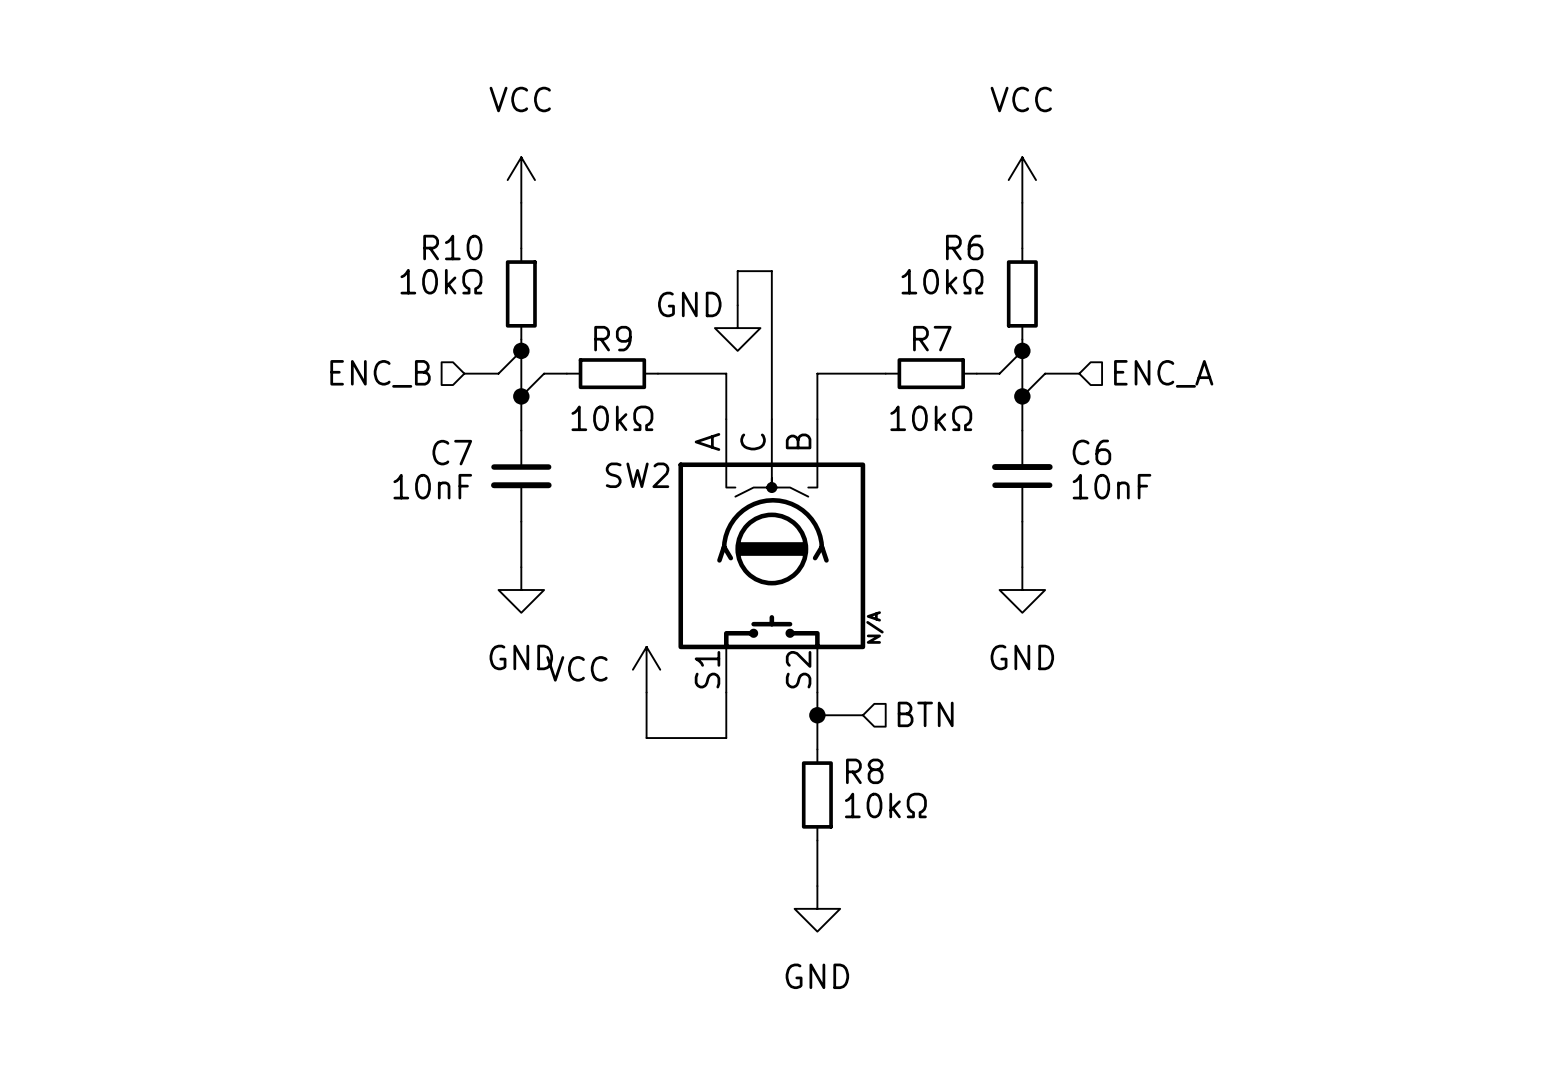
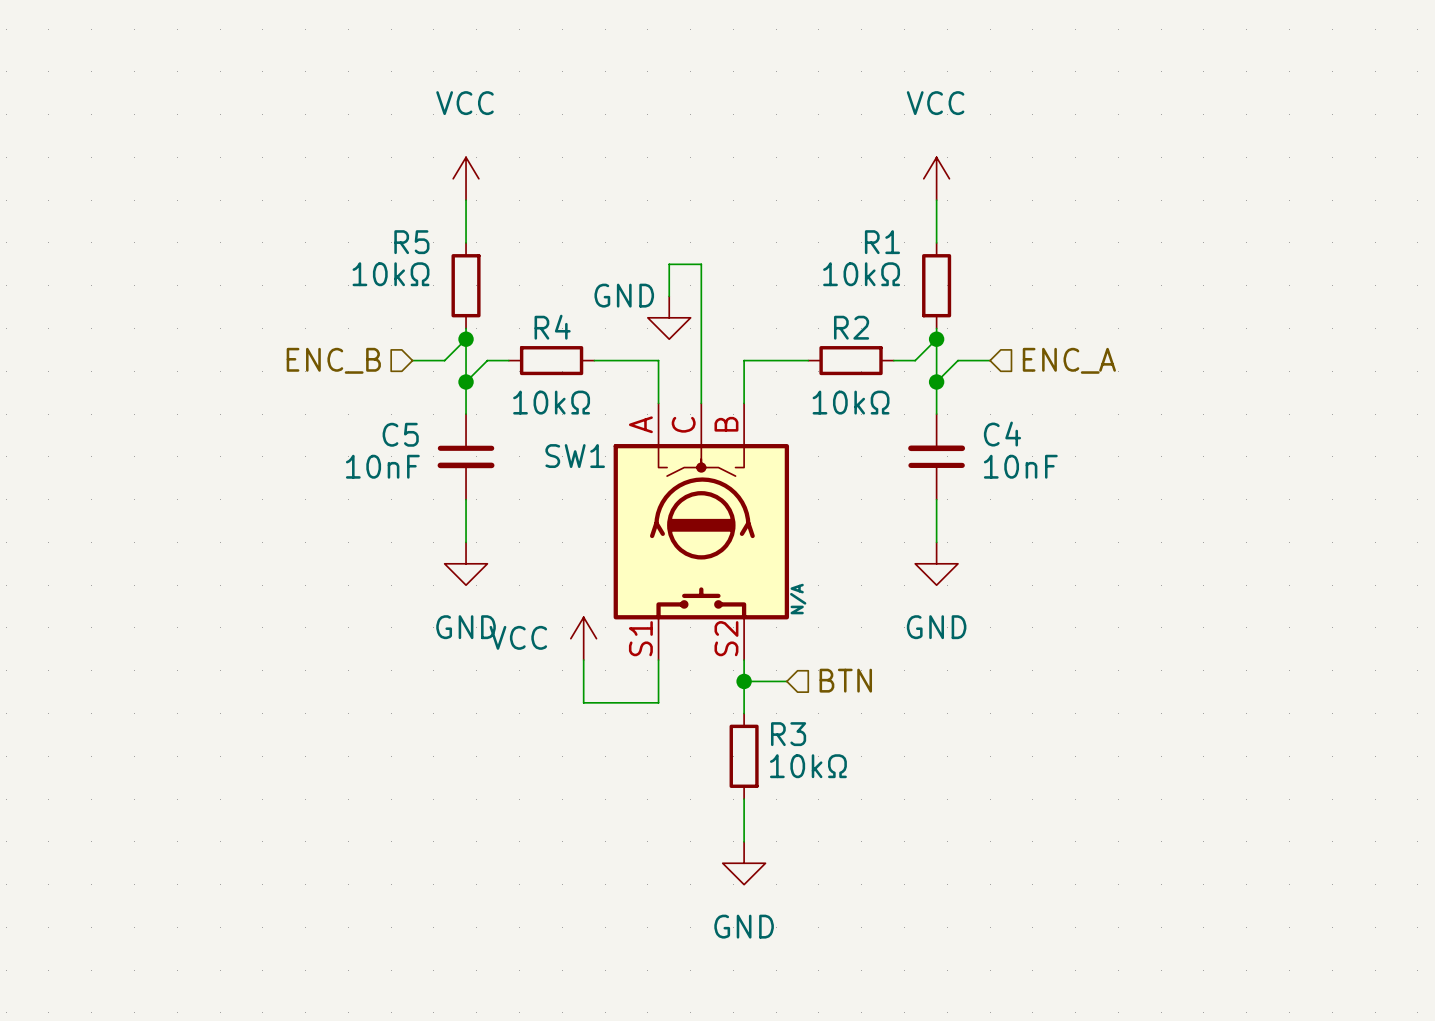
R10 name: R10 (452, 247) -> R5 (411, 242)
R6 name: R6 (964, 247) -> R1 (882, 242)
R9 name: R9 (612, 338) -> R4 (552, 327)
R7 name: R7 (932, 338) -> R2 (851, 327)
C7 name: C7 (452, 452) -> C5 (400, 434)
C6 name: C6 (1091, 452) -> C4 (1002, 434)
SW2 name: SW2 (637, 475) -> SW1 (575, 456)
R8 name: R8 (864, 771) -> R3 (788, 734)

